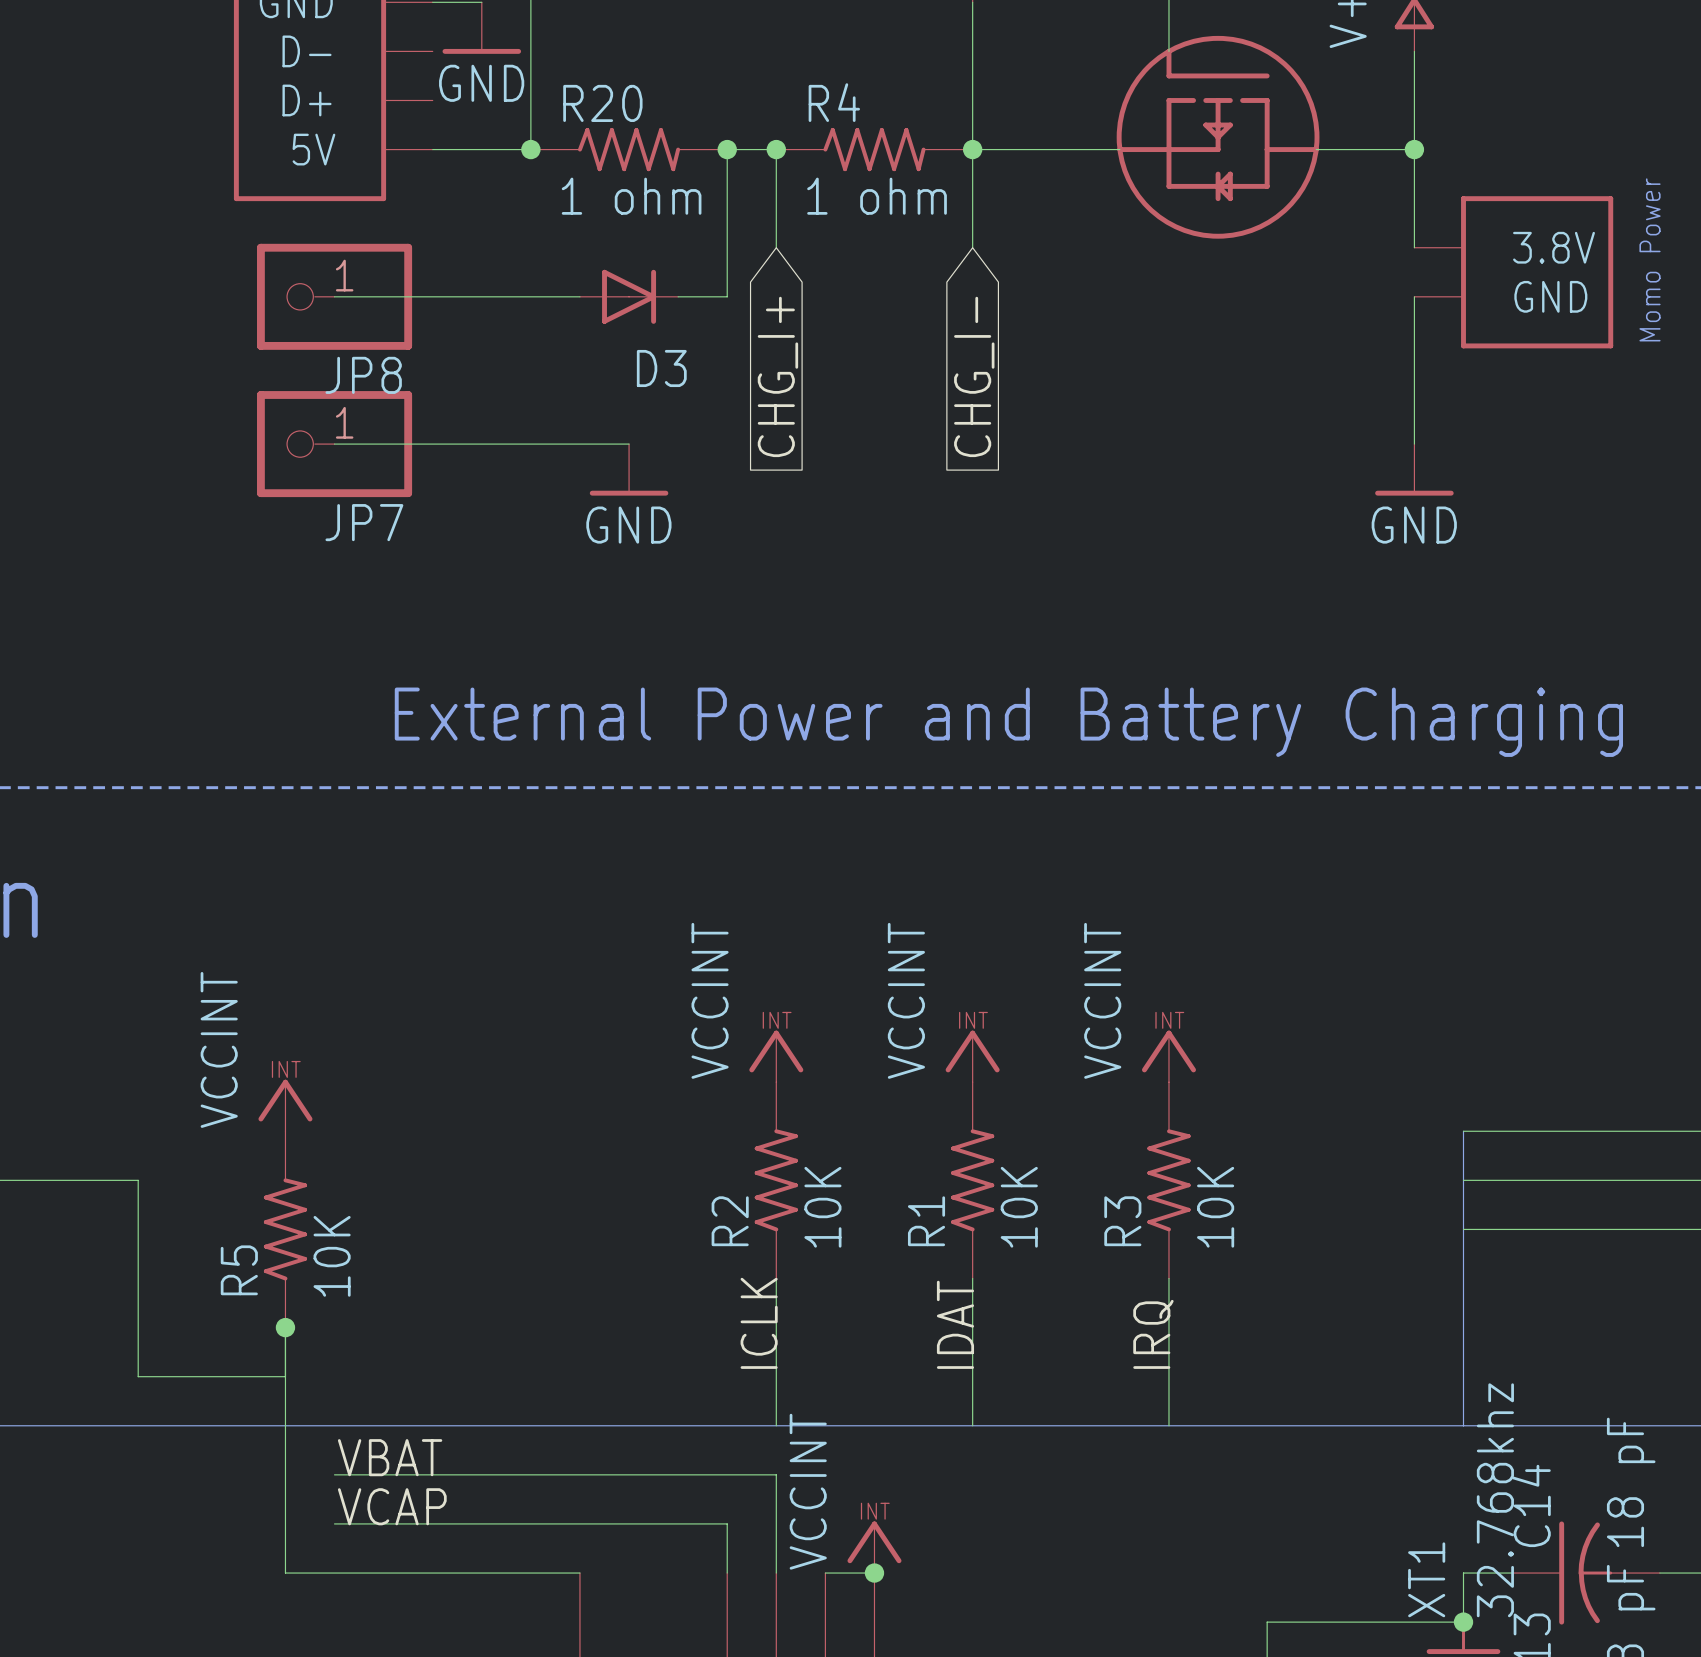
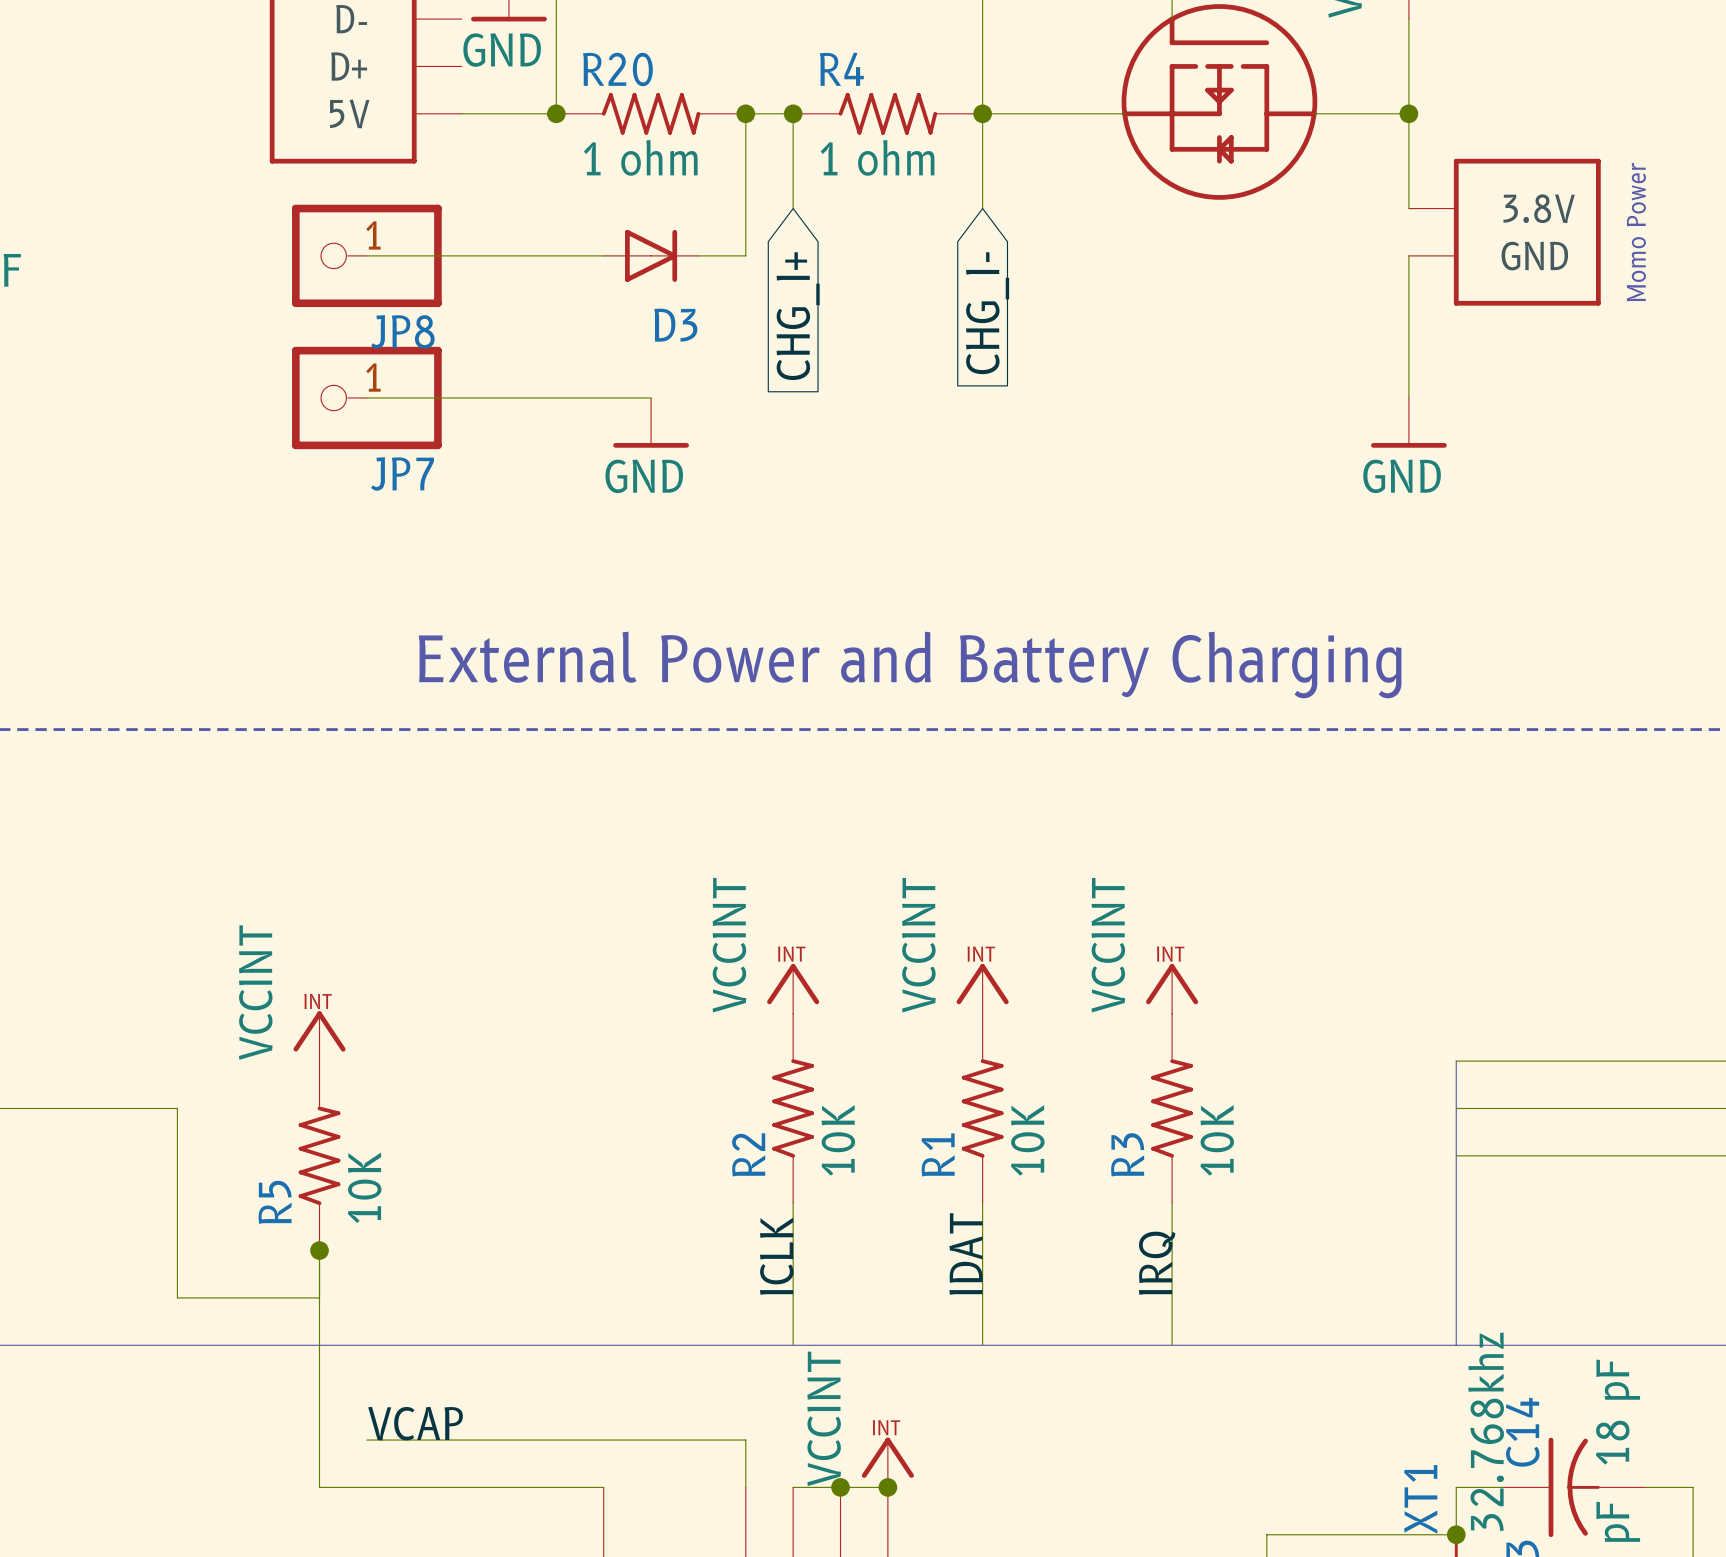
label: VBAT (390, 1457) -> none
wire: (334, 1474) (776, 1474) (776, 1573) -> (840, 1487) (793, 1487)
junction: none -> (840, 1487)

